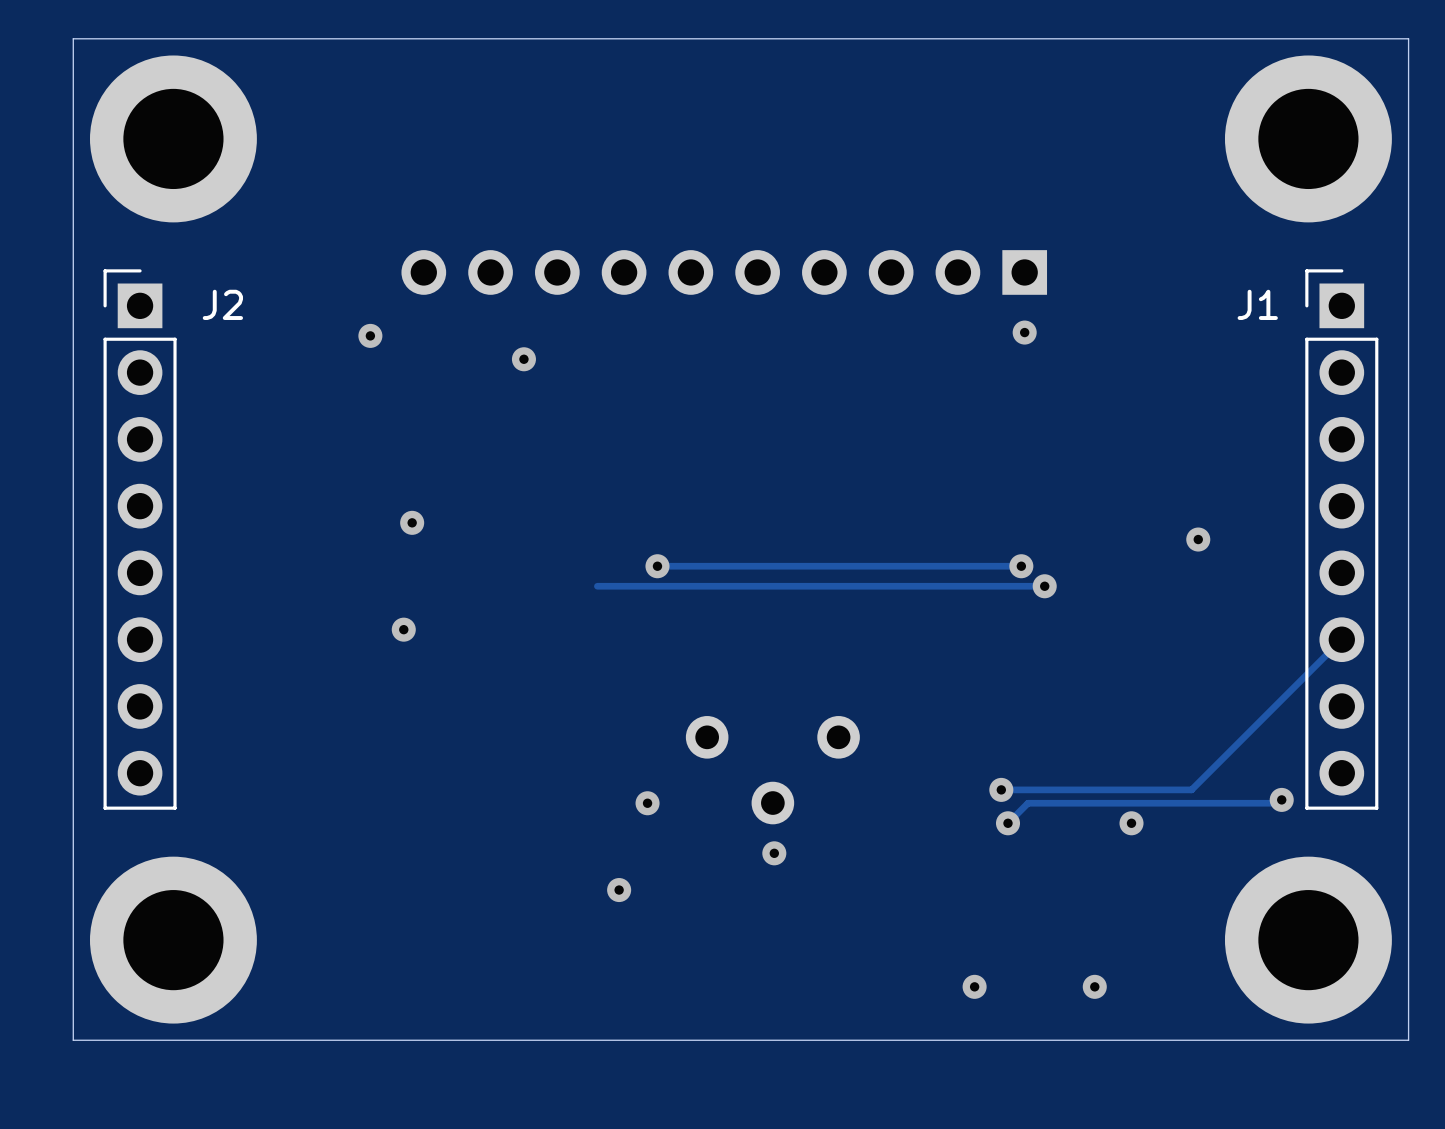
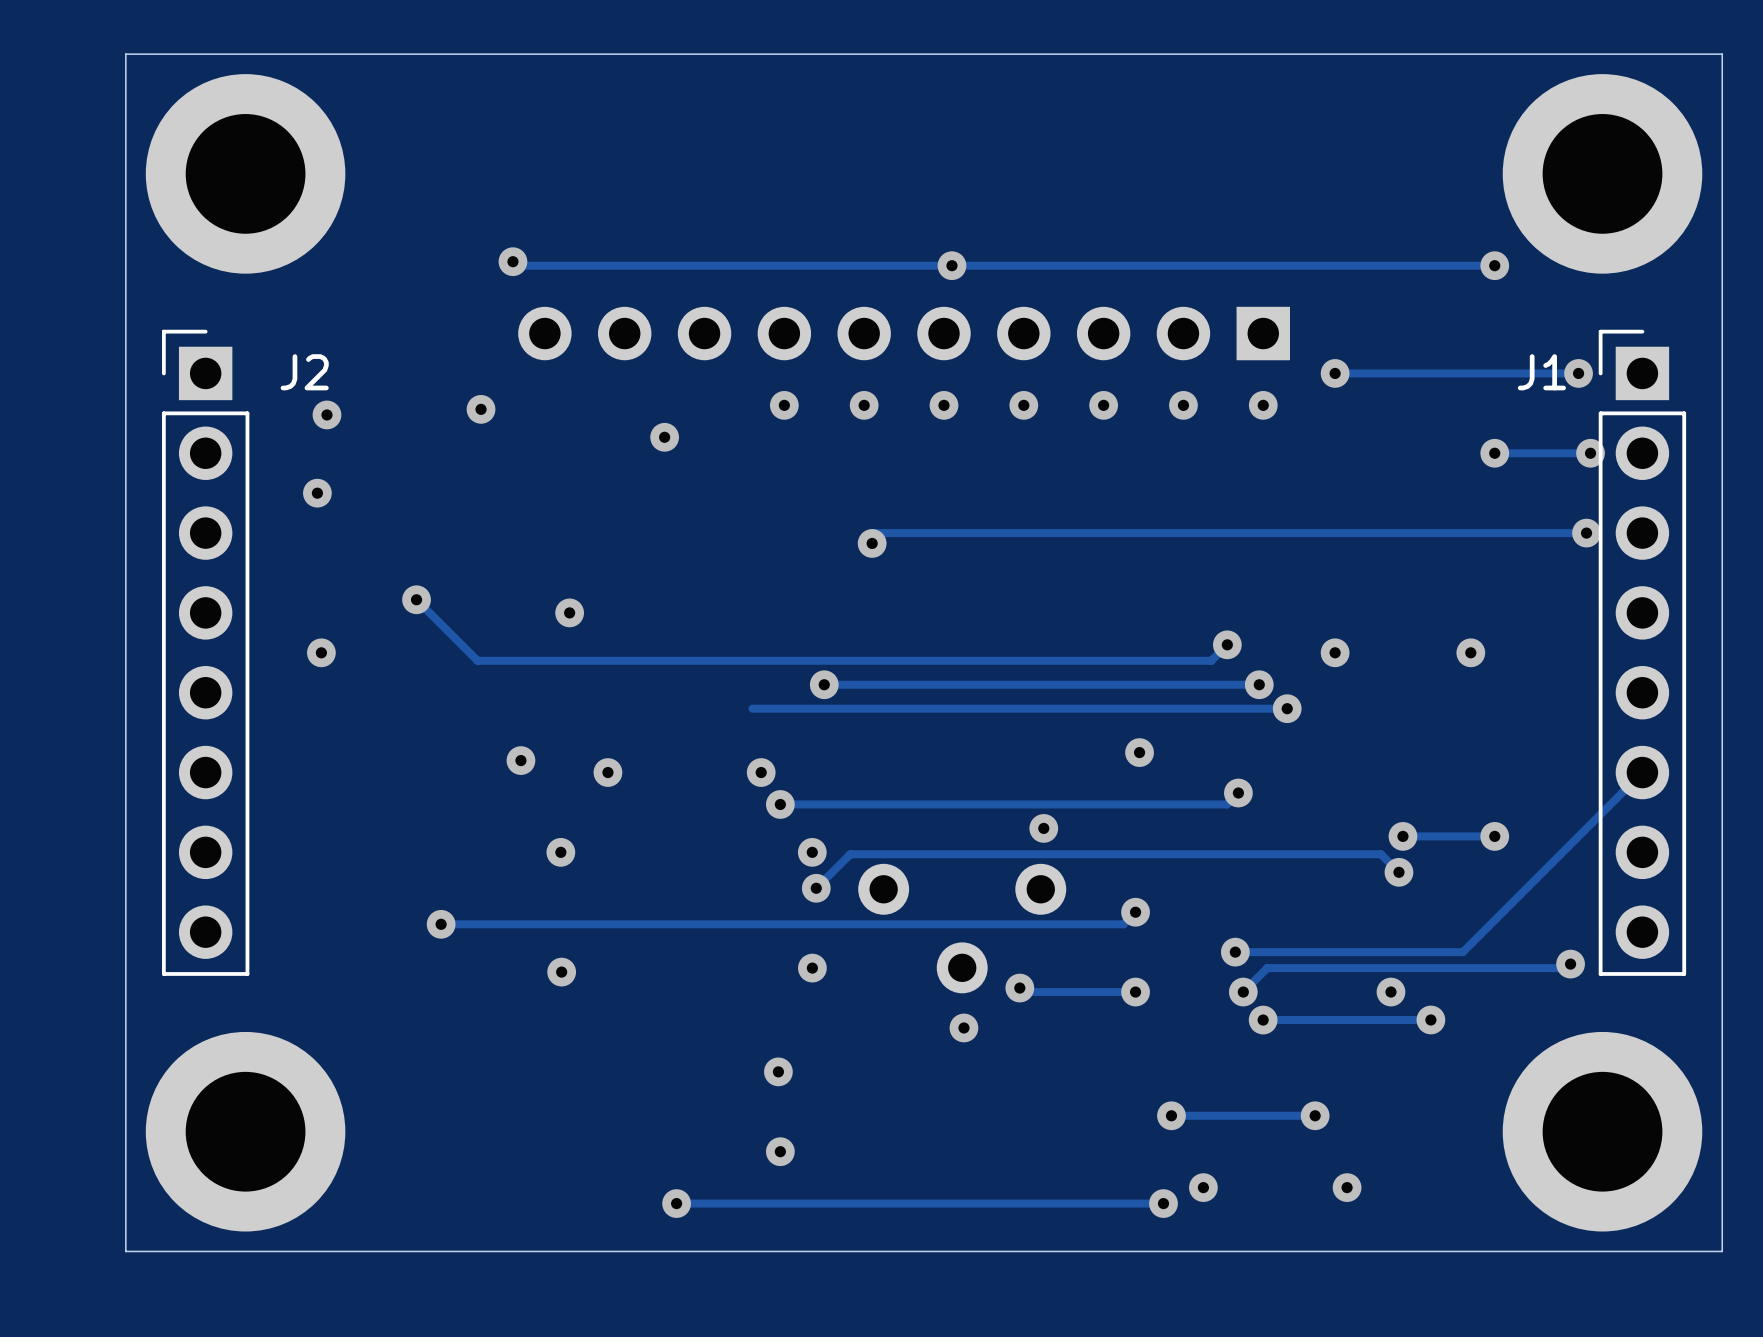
track: none -> (512, 261) (516, 265) (1494, 265)
via: none -> (512, 261)
via: none -> (951, 265)
via: none -> (1494, 265)
via: none -> (1335, 373)
track: none -> (1578, 373) (1335, 373)
via: none -> (1578, 373)
via: none -> (784, 405)
via: none -> (864, 405)
via: none -> (943, 405)
via: none -> (1023, 405)
via: none -> (1103, 405)
via: none -> (1183, 405)
via: none -> (326, 414)
via: none -> (1494, 453)
track: none -> (1590, 453) (1494, 453)
via: none -> (1590, 453)
via: none -> (317, 493)
track: none -> (1586, 533) (872, 533) (870, 535) (872, 543)
via: none -> (1586, 533)
via: none -> (872, 543)
track: none -> (416, 599) (477, 660) (1211, 660) (1227, 644)
via: none -> (416, 599)
via position: (412, 522) -> (569, 612)
via: none -> (1227, 644)
via: none -> (321, 652)
via: none -> (1335, 652)
via: none -> (1139, 752)
via: none -> (607, 772)
via: none -> (761, 772)
track: none -> (1238, 793) (1226, 804) (780, 804)
via: none -> (1238, 793)
via: none -> (780, 804)
via: none -> (1043, 828)
via: none -> (1402, 836)
track: none -> (1494, 836) (1402, 836)
via: none -> (1494, 836)
via: none -> (560, 852)
via: none -> (812, 852)
track: none -> (1398, 872) (1380, 854) (850, 854) (816, 888)
via: none -> (1398, 872)
via: none -> (816, 888)
track: none -> (1135, 912) (1123, 924) (437, 924)
via: none -> (1135, 912)
via: none -> (441, 924)
via: none -> (561, 972)
track: none -> (1019, 988) (1023, 992) (1135, 992)
via: none -> (1019, 988)
via: none -> (1135, 992)
via: none -> (1263, 1020)
track: none -> (1430, 1019) (1263, 1019)
via: none -> (1430, 1019)
via: none -> (1171, 1115)
track: none -> (1315, 1115) (1171, 1115)
via: none -> (1315, 1115)
via: none -> (780, 1151)
via: none -> (676, 1203)
track: none -> (1163, 1203) (676, 1203)
via: none -> (1163, 1203)

